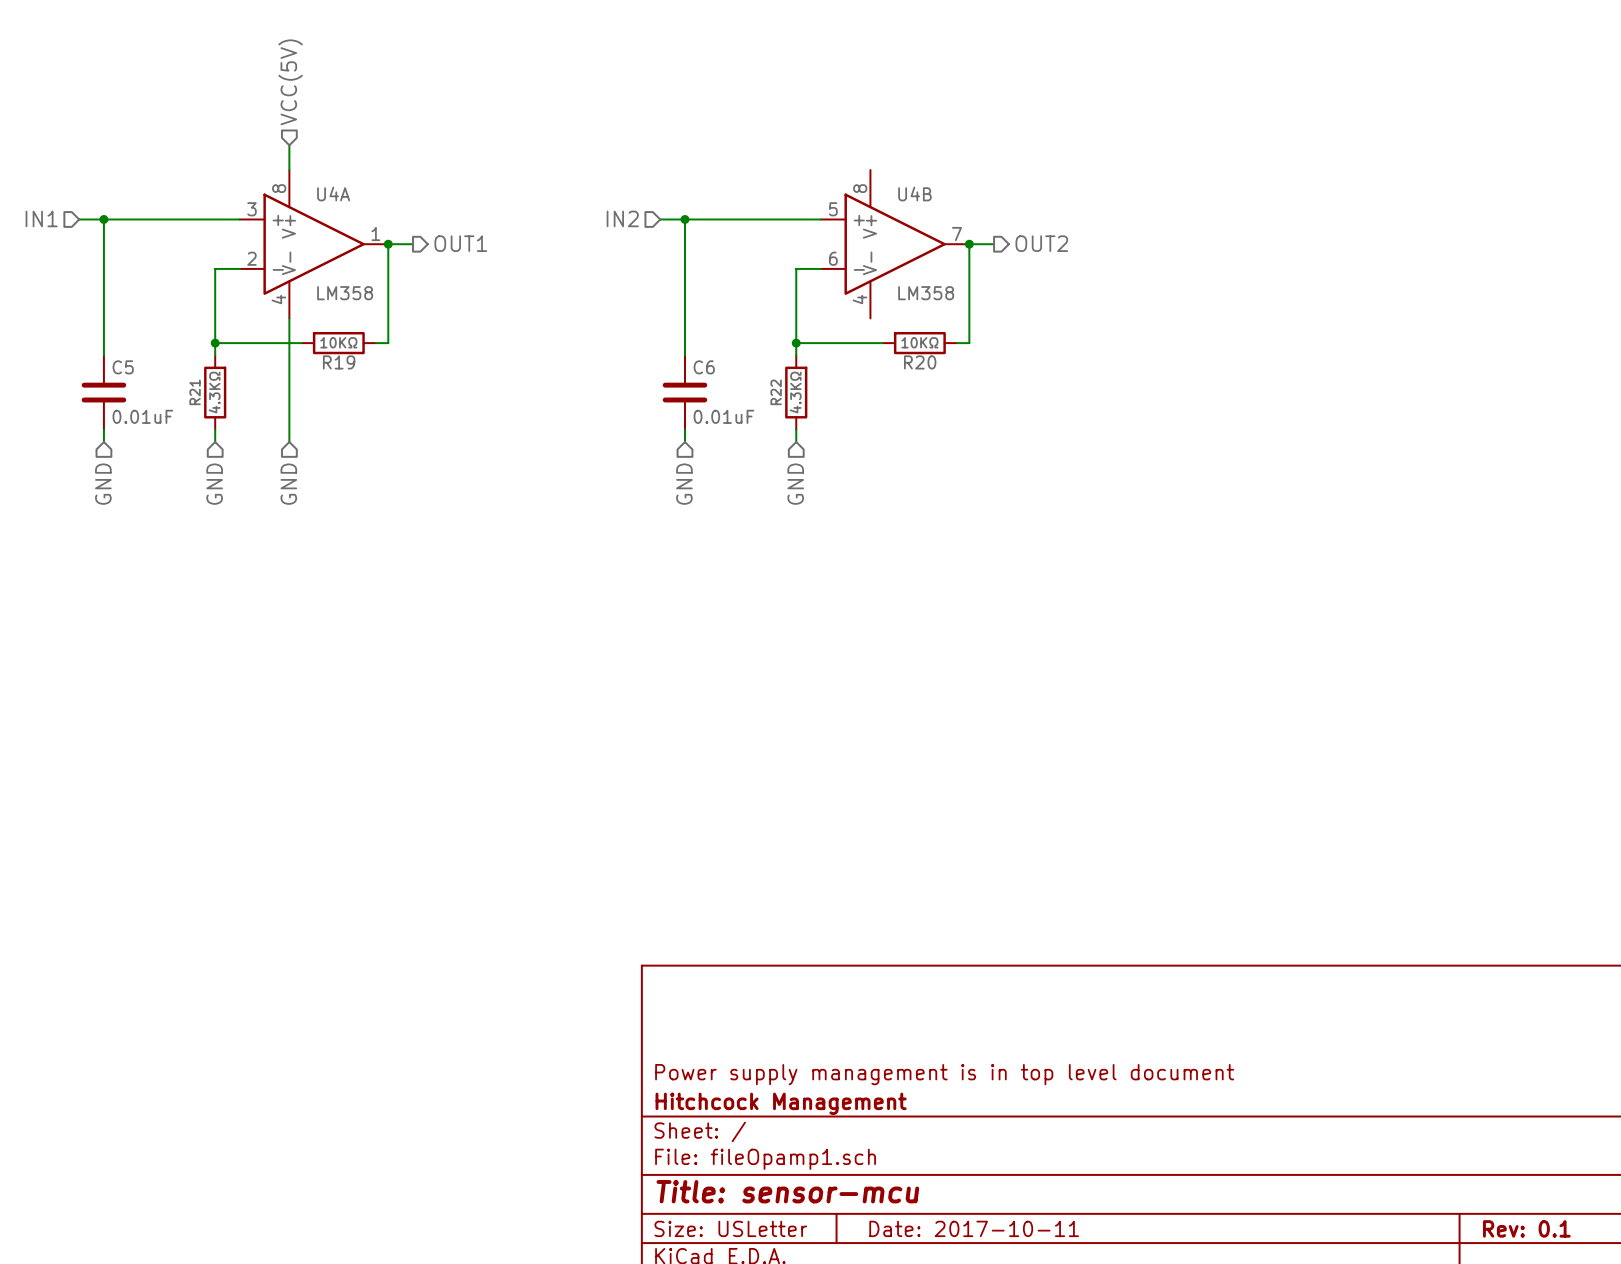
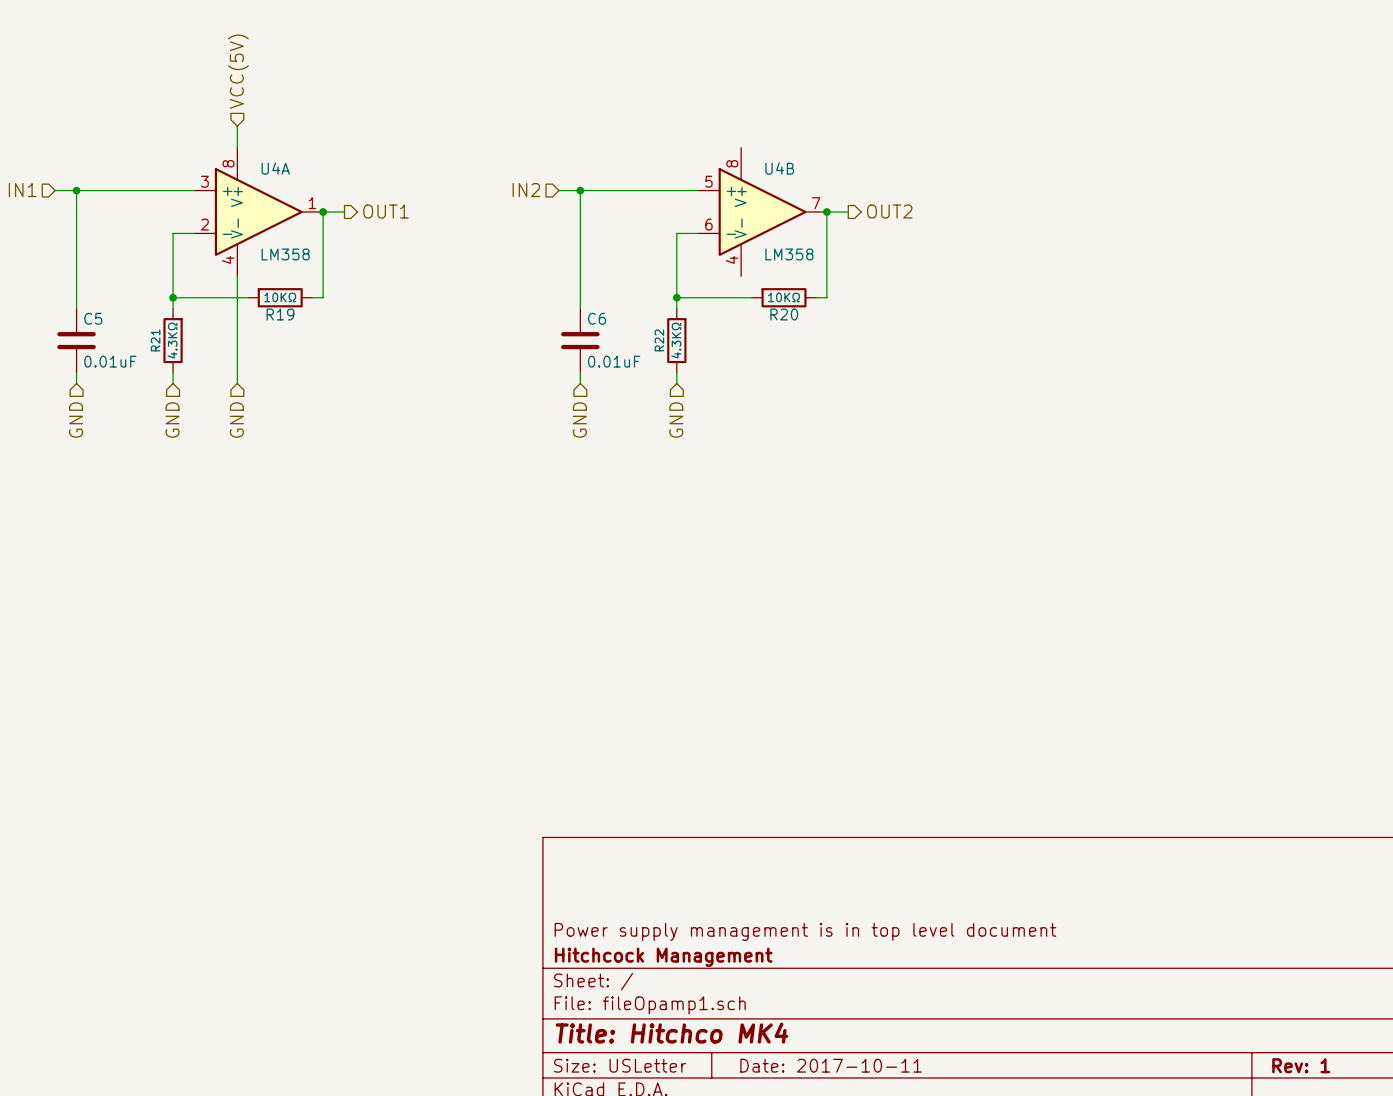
title block: Title: sensor-mcu (787, 1191) -> Title: Hitchco MK4 (671, 1033)
title block: Rev: 0.1 (1526, 1228) -> Rev: 1 (1301, 1065)

